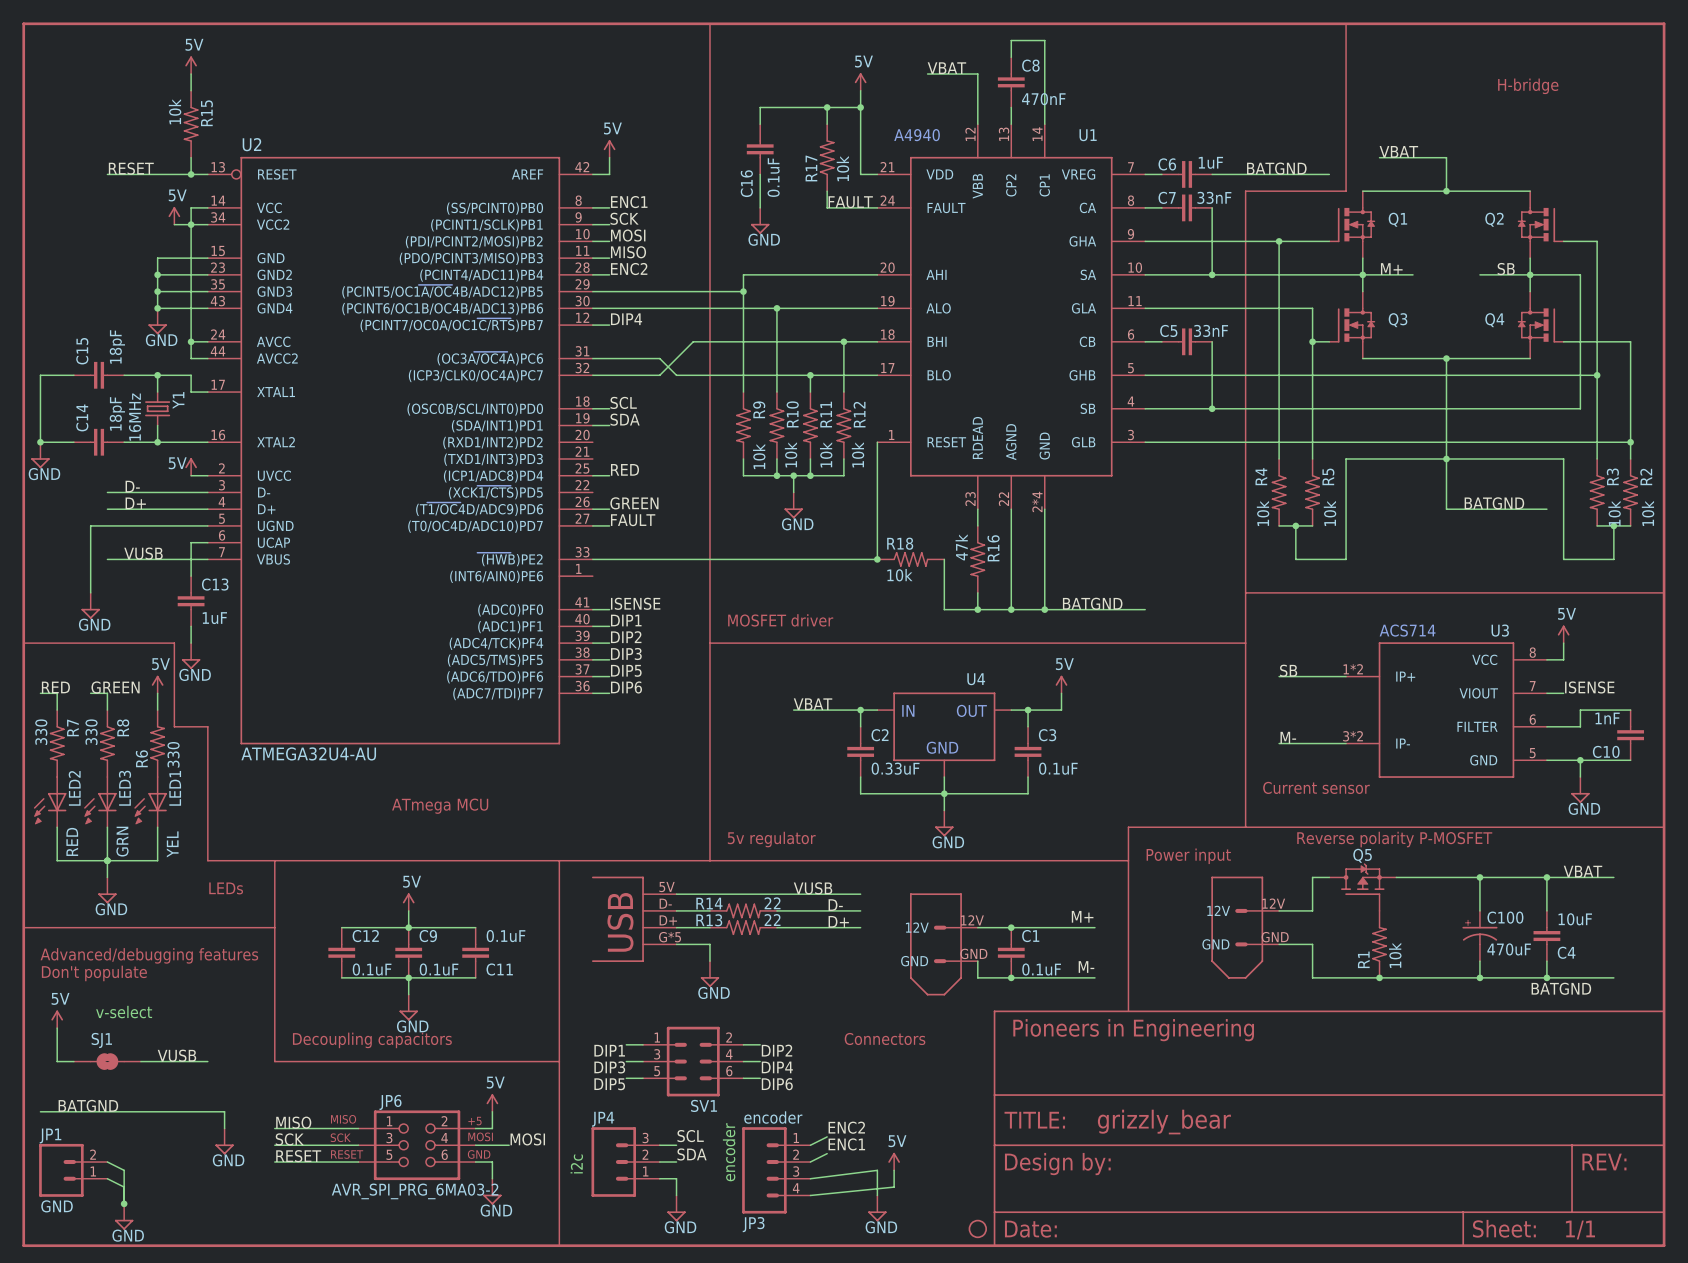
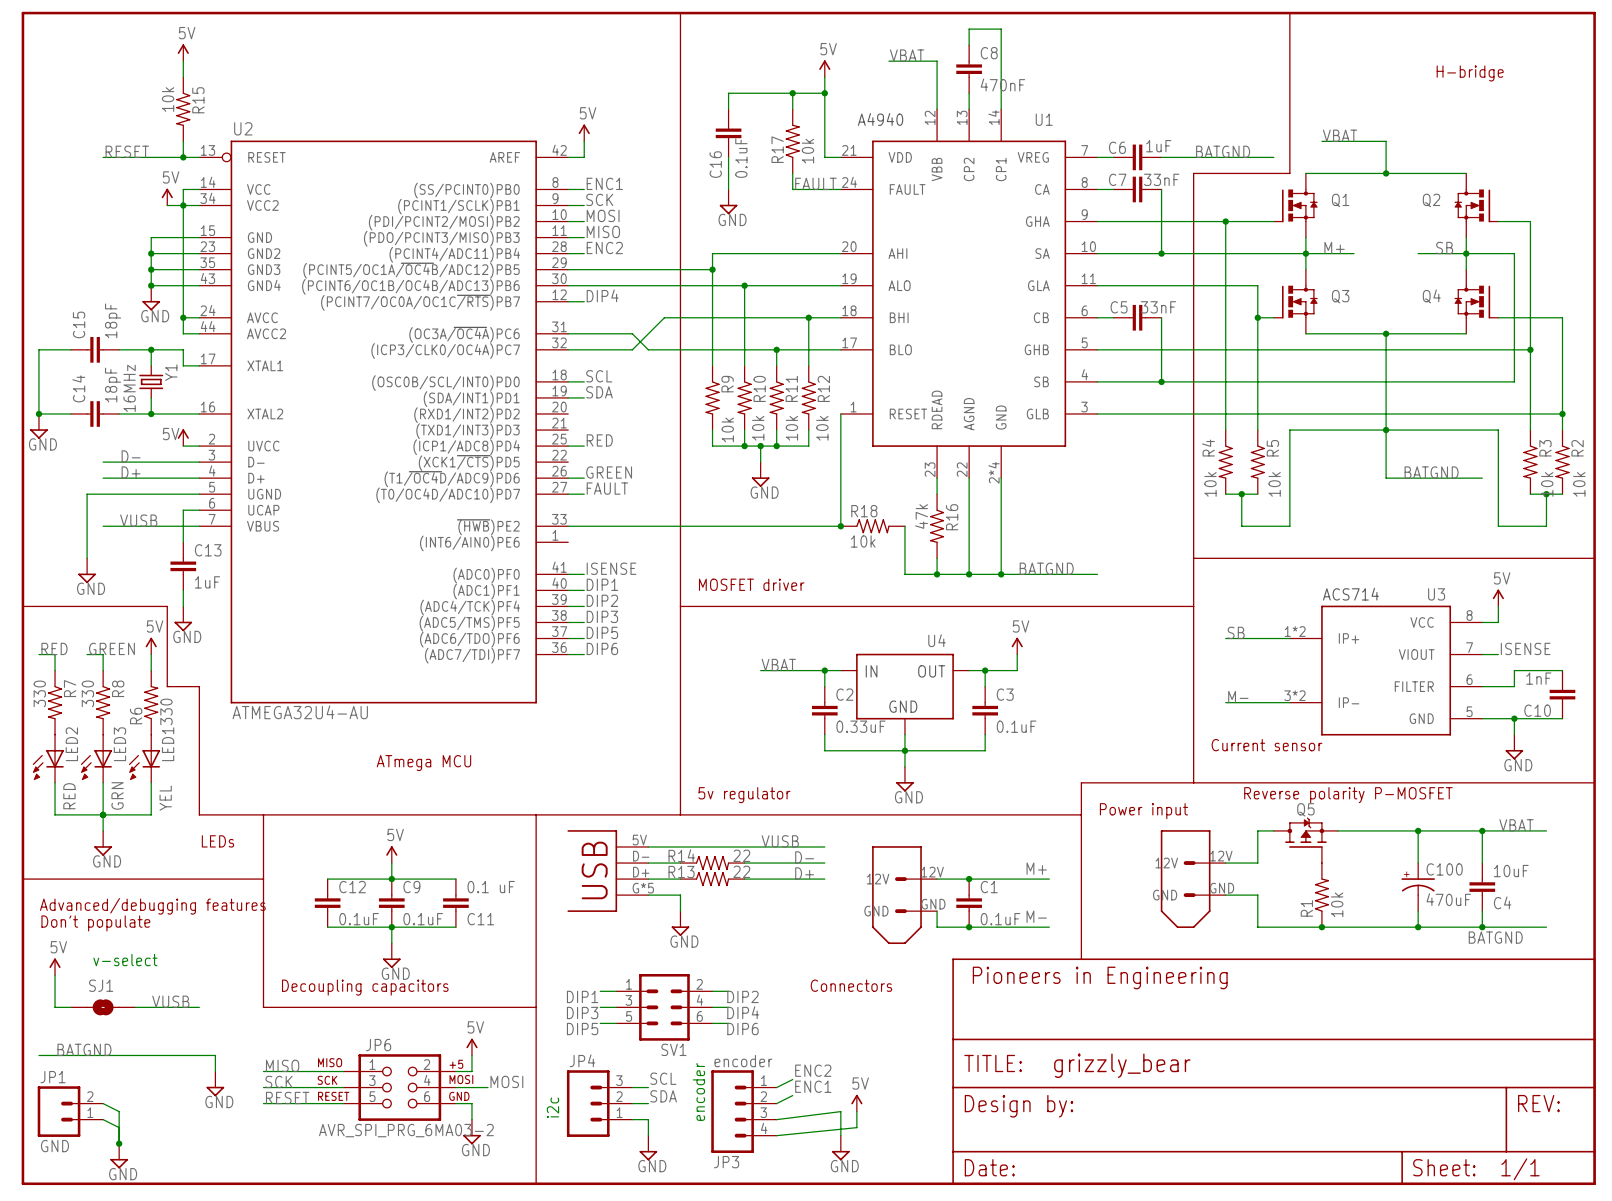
C11 value: 0.1uF (506, 936) -> 0.1 uF (491, 887)
part: (977, 1228) -> none

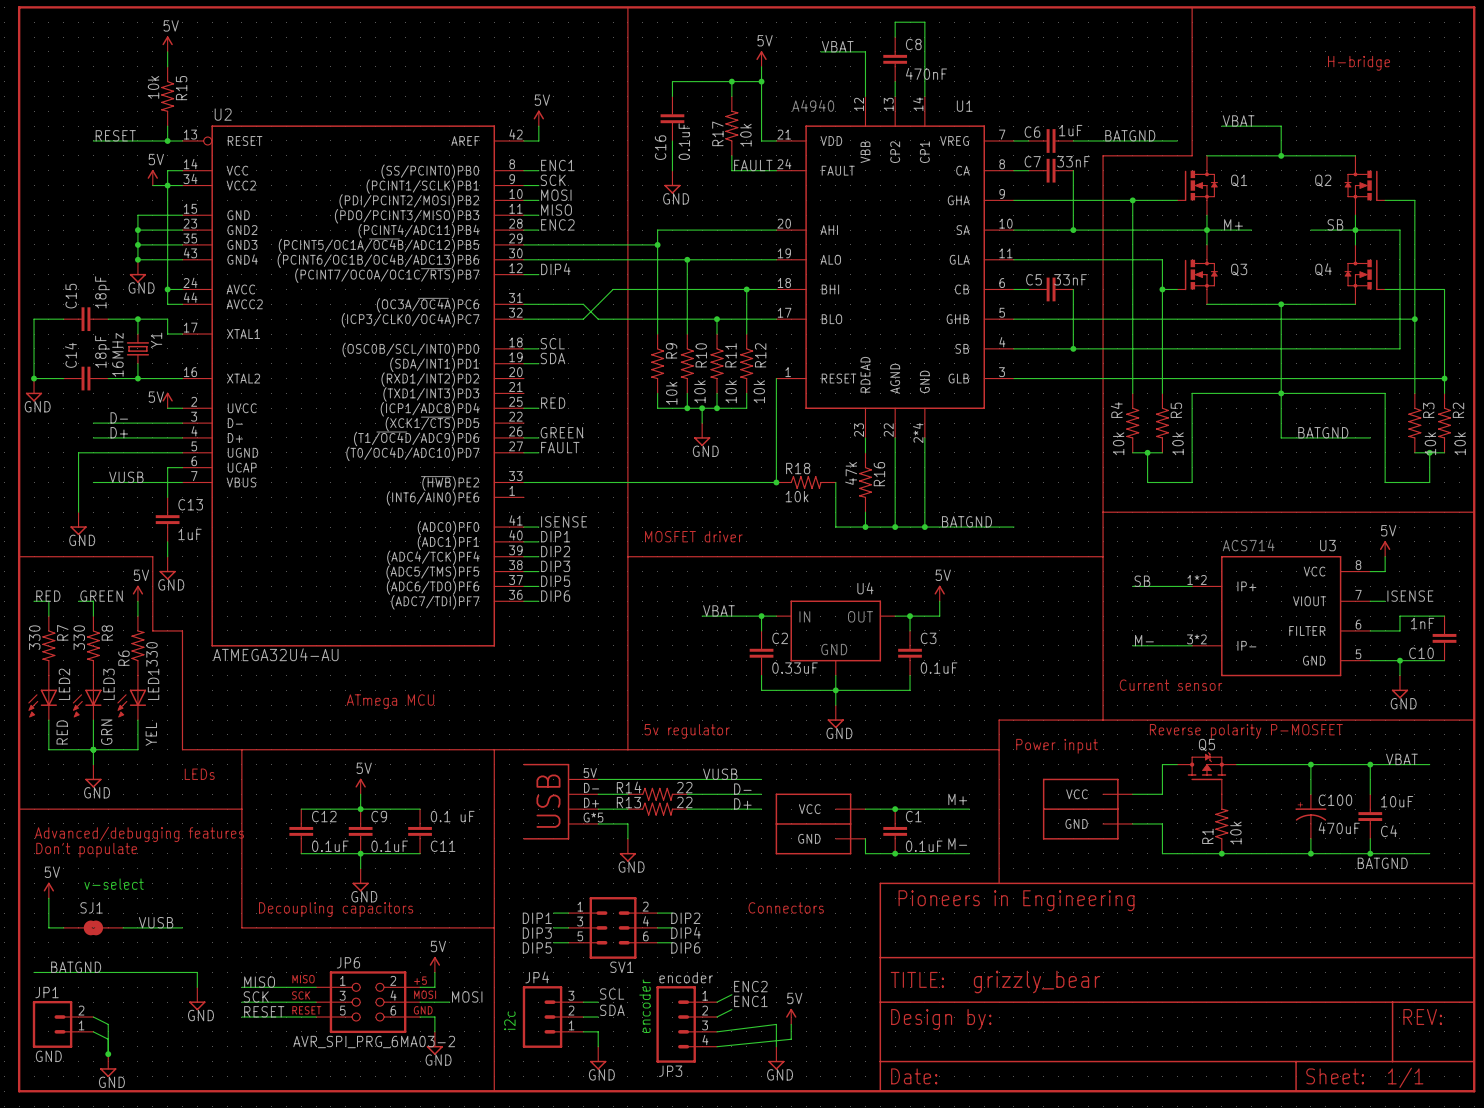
part: none -> (1087, 809)
part: (1193, 879) -> none
part: none -> (820, 823)
part: (904, 895) -> none

